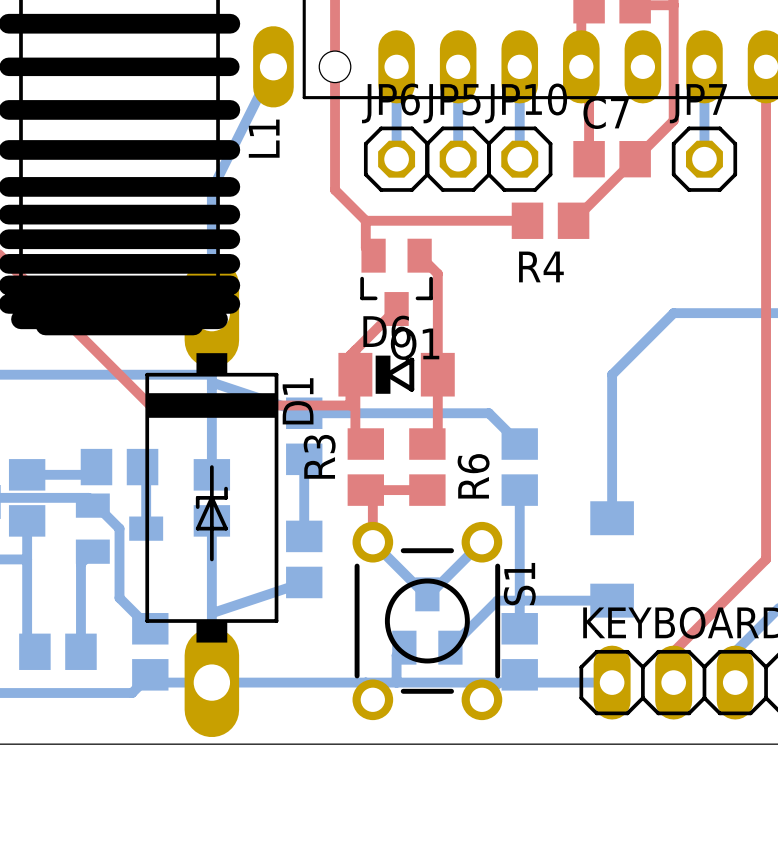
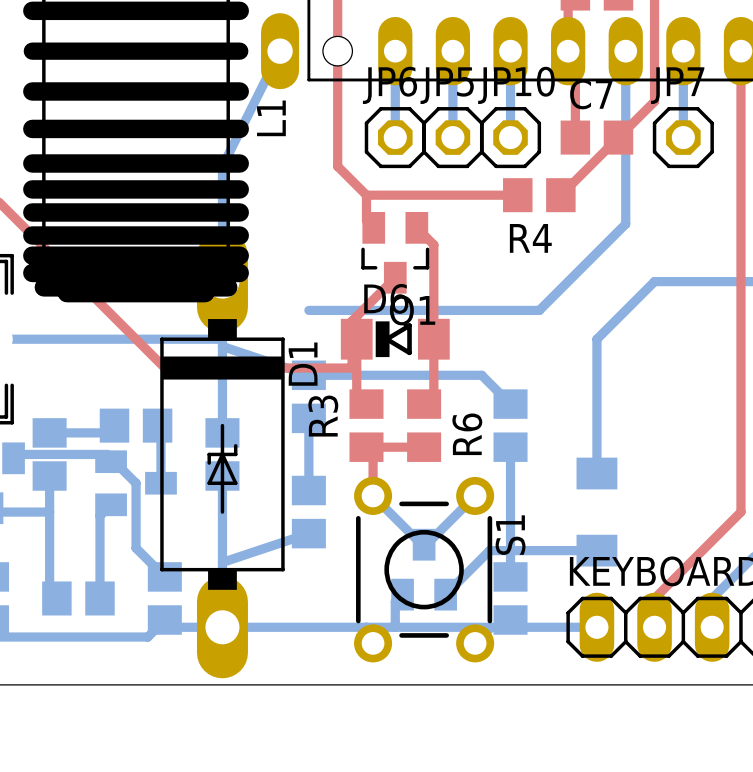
bottom track: none -> (625, 51) (625, 223) (539, 310) (308, 310)

